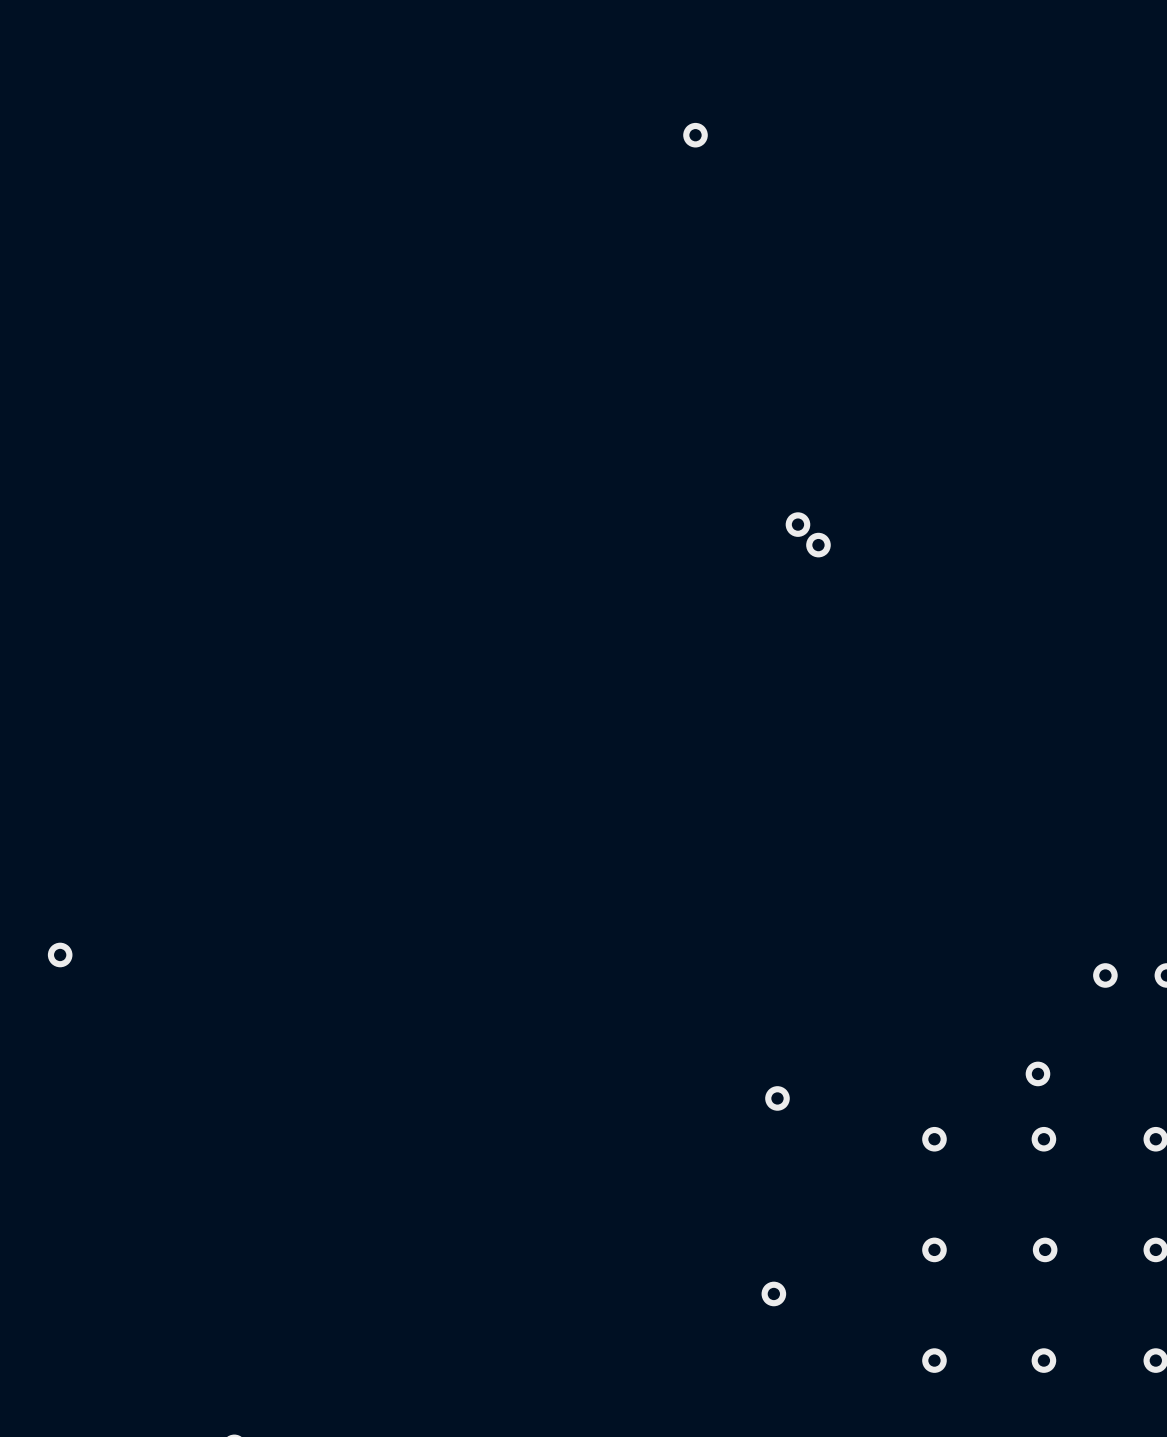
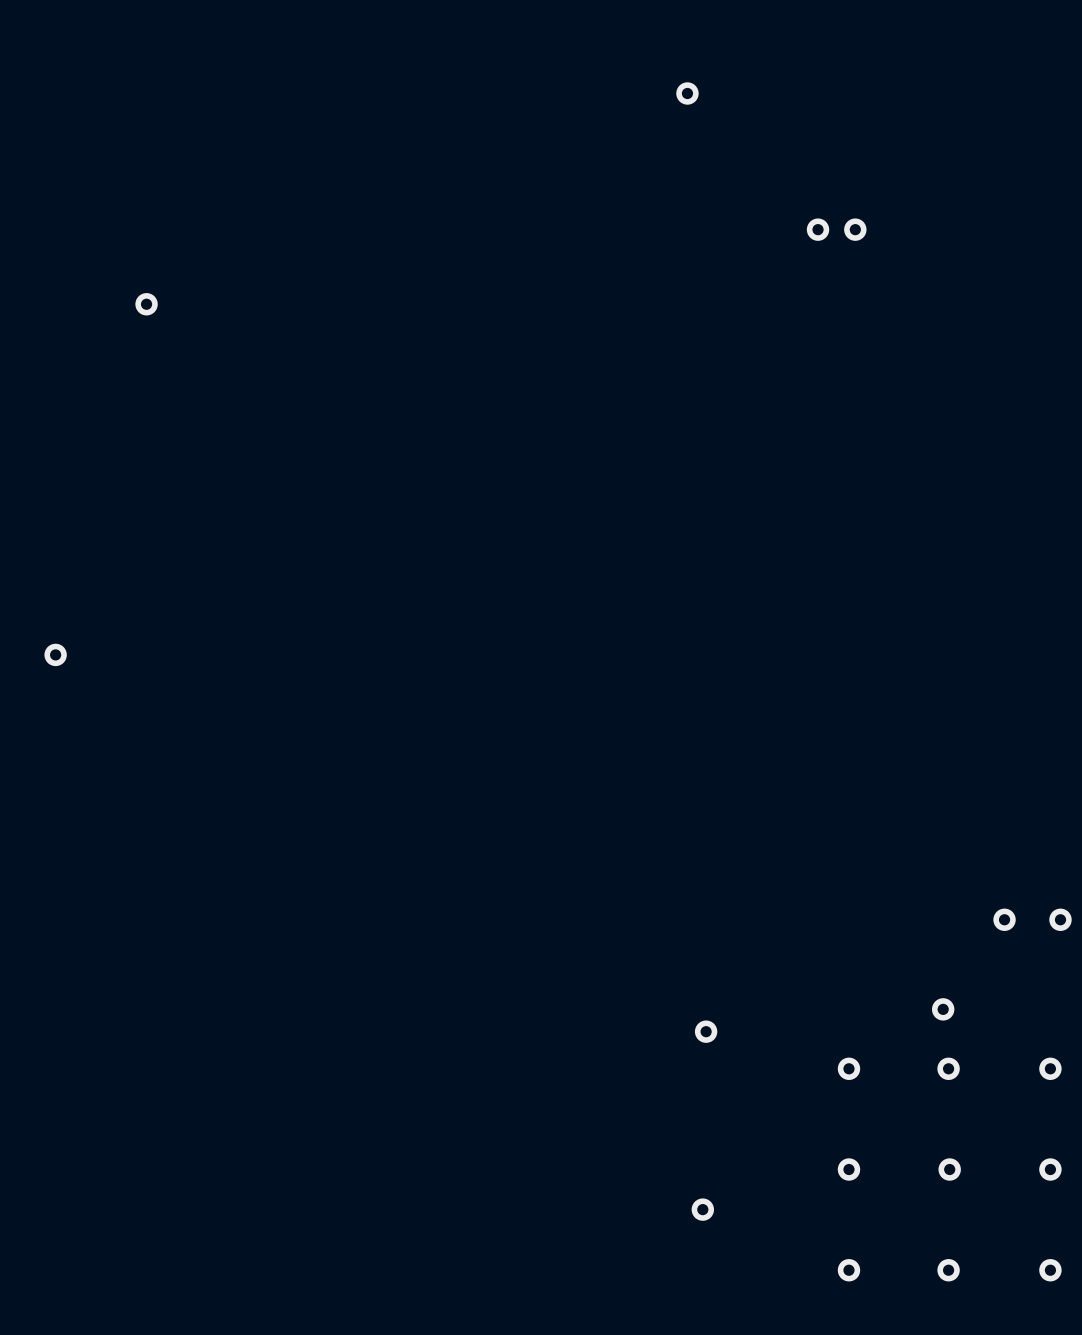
via position: (695, 135) -> (687, 93)
via: none -> (818, 229)
via: none -> (855, 229)
via: none -> (146, 304)
via: (797, 524) -> none
via: (818, 545) -> none
via: none -> (55, 654)
via: (60, 954) -> none

